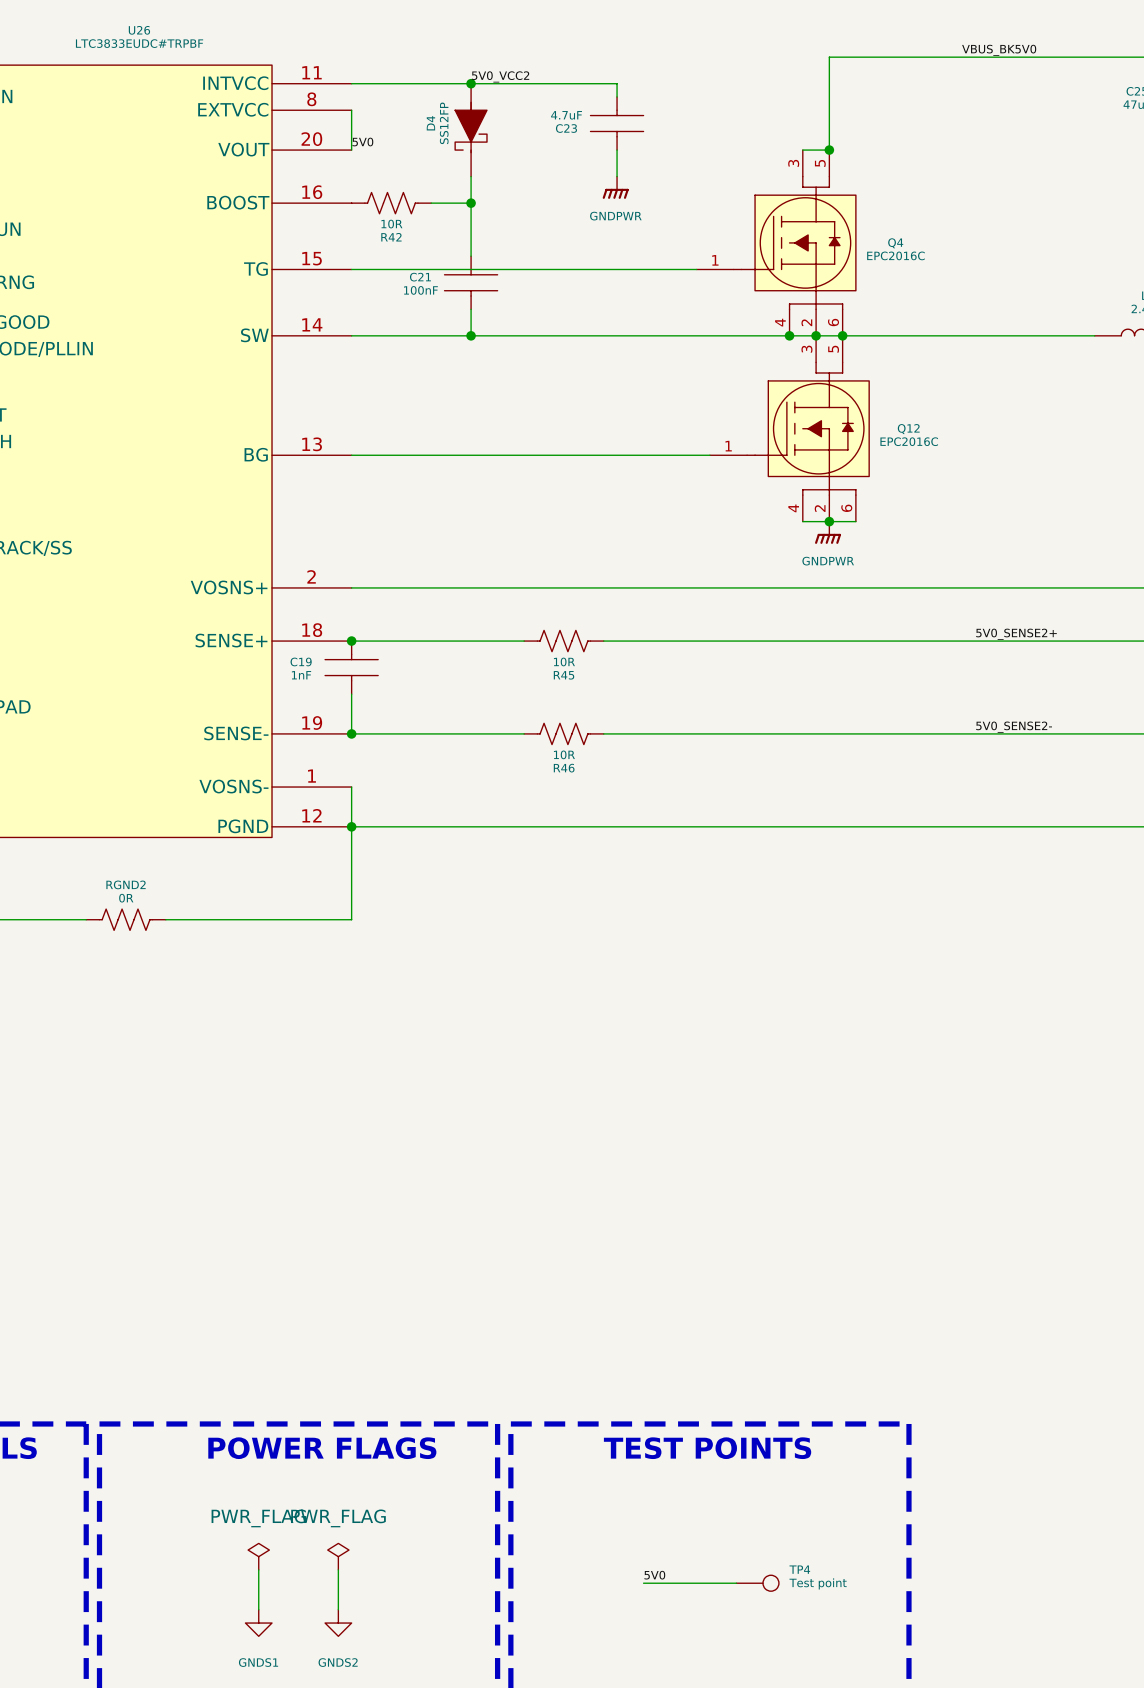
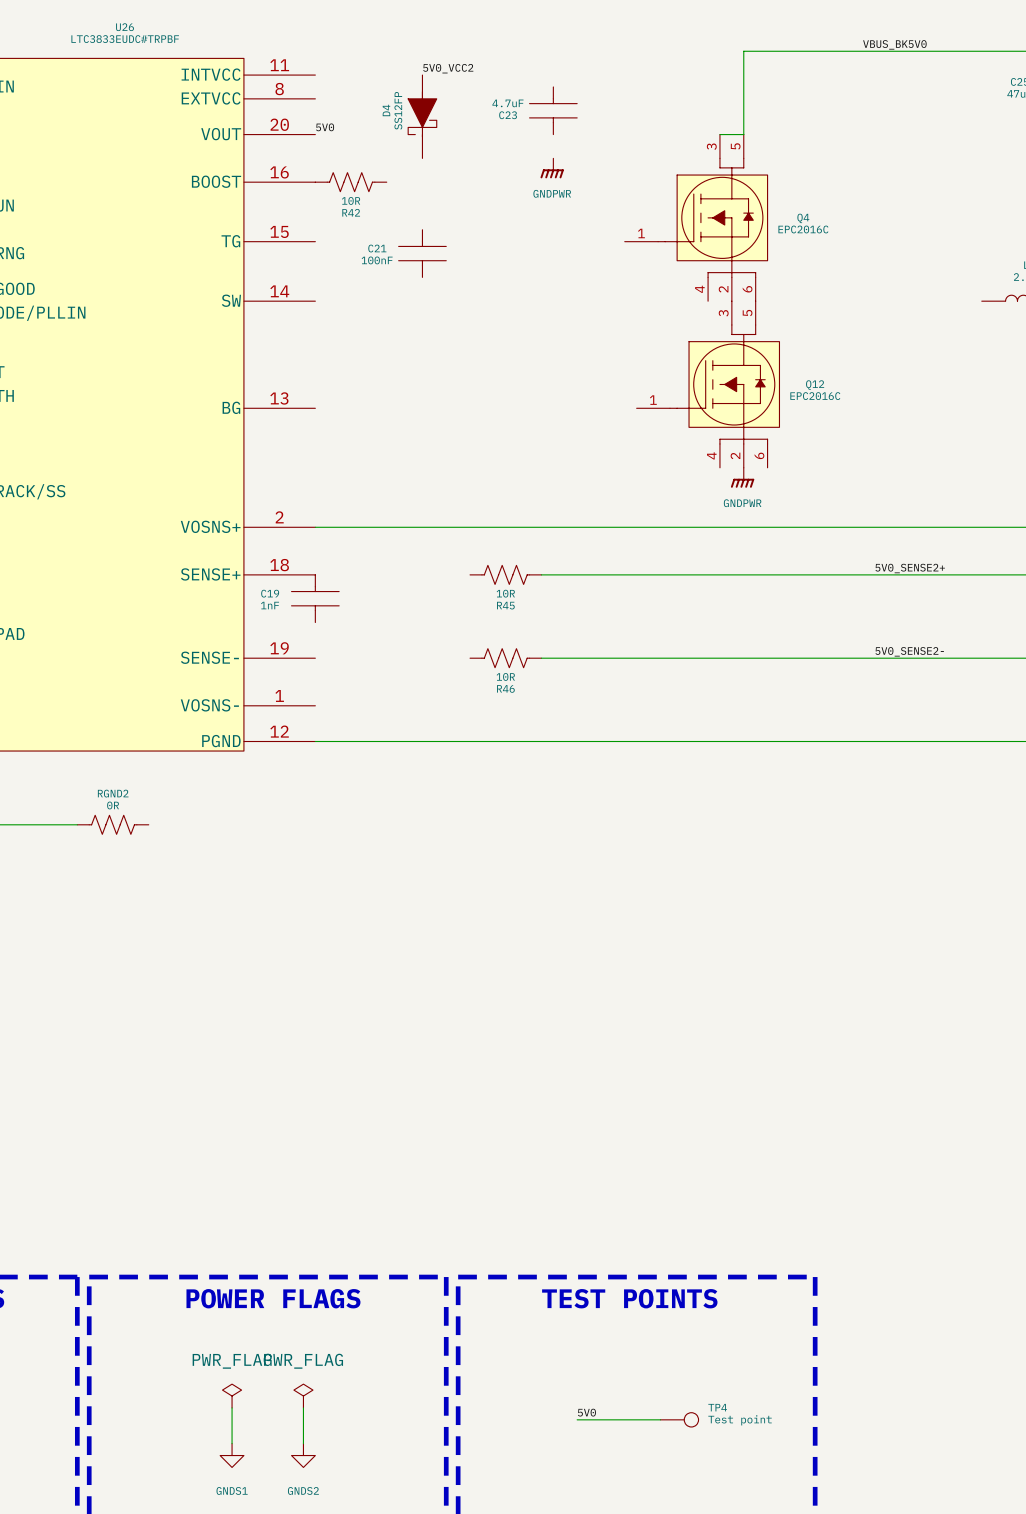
wire: (351, 83) (617, 83) (617, 96) -> none
junction: (471, 83) -> none
wire: (351, 110) (351, 150) -> none
wire: (617, 150) (617, 176) -> none
junction: (829, 150) -> none
wire: (471, 176) (471, 256) -> none
wire: (431, 203) (471, 203) -> none
junction: (471, 203) -> none
wire: (351, 269) (696, 269) -> none
wire: (471, 309) (471, 335) -> none
wire: (351, 335) (1094, 335) -> none
junction: (471, 335) -> none
junction: (789, 335) -> none
junction: (816, 335) -> none
junction: (842, 335) -> none
wire: (351, 455) (709, 455) -> none
wire: (802, 521) (855, 521) -> none
junction: (829, 521) -> none
wire: (351, 641) (524, 641) -> none
junction: (351, 641) -> none
wire: (351, 694) (351, 733) (524, 733) -> none
junction: (351, 733) -> none
wire: (351, 787) (351, 919) (165, 919) -> none
junction: (351, 826) -> none

